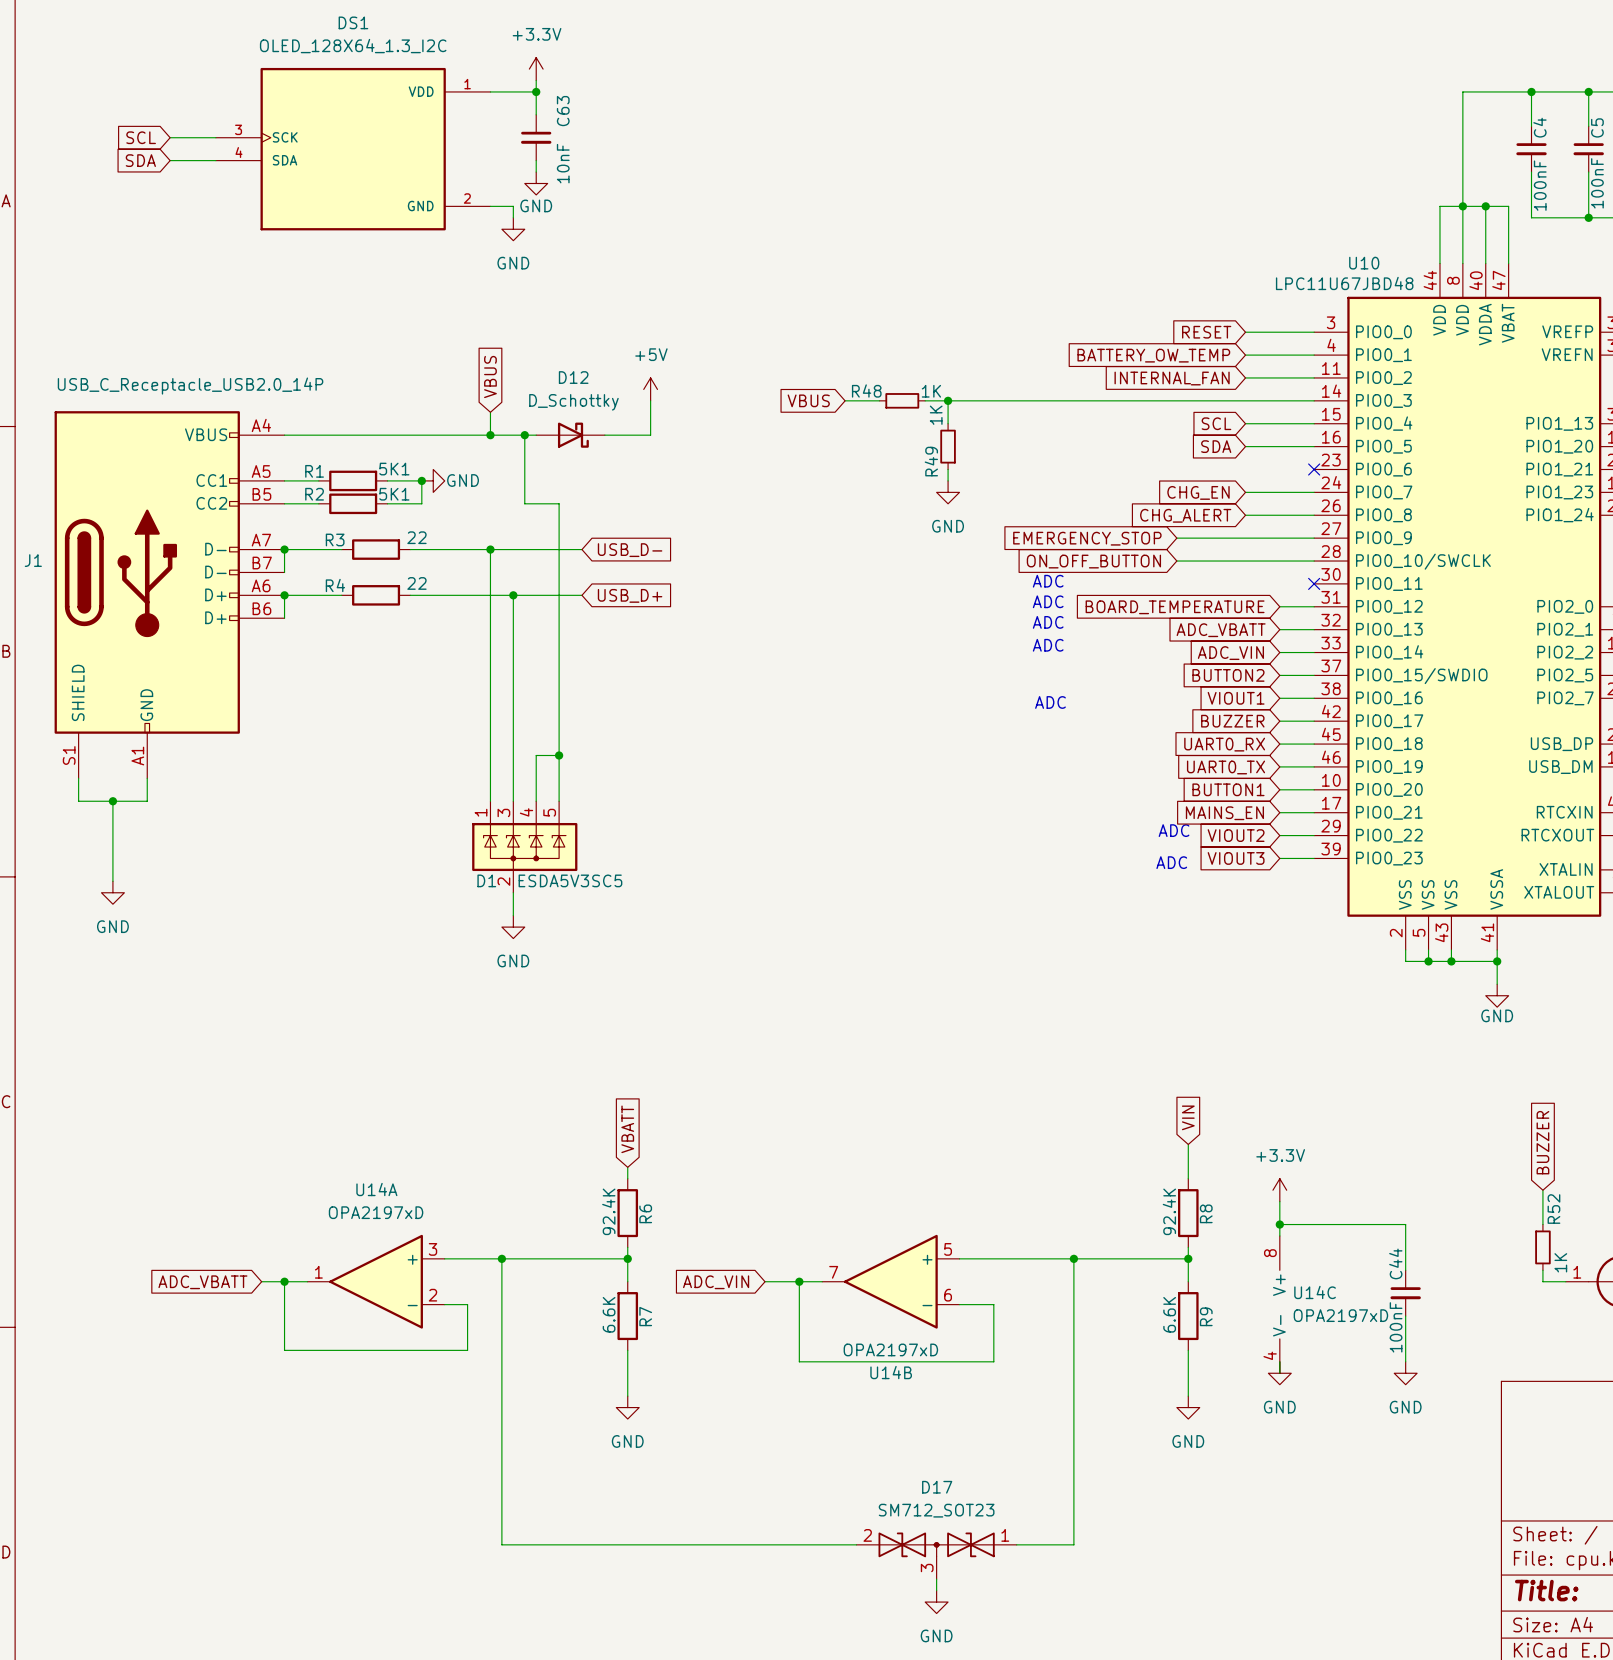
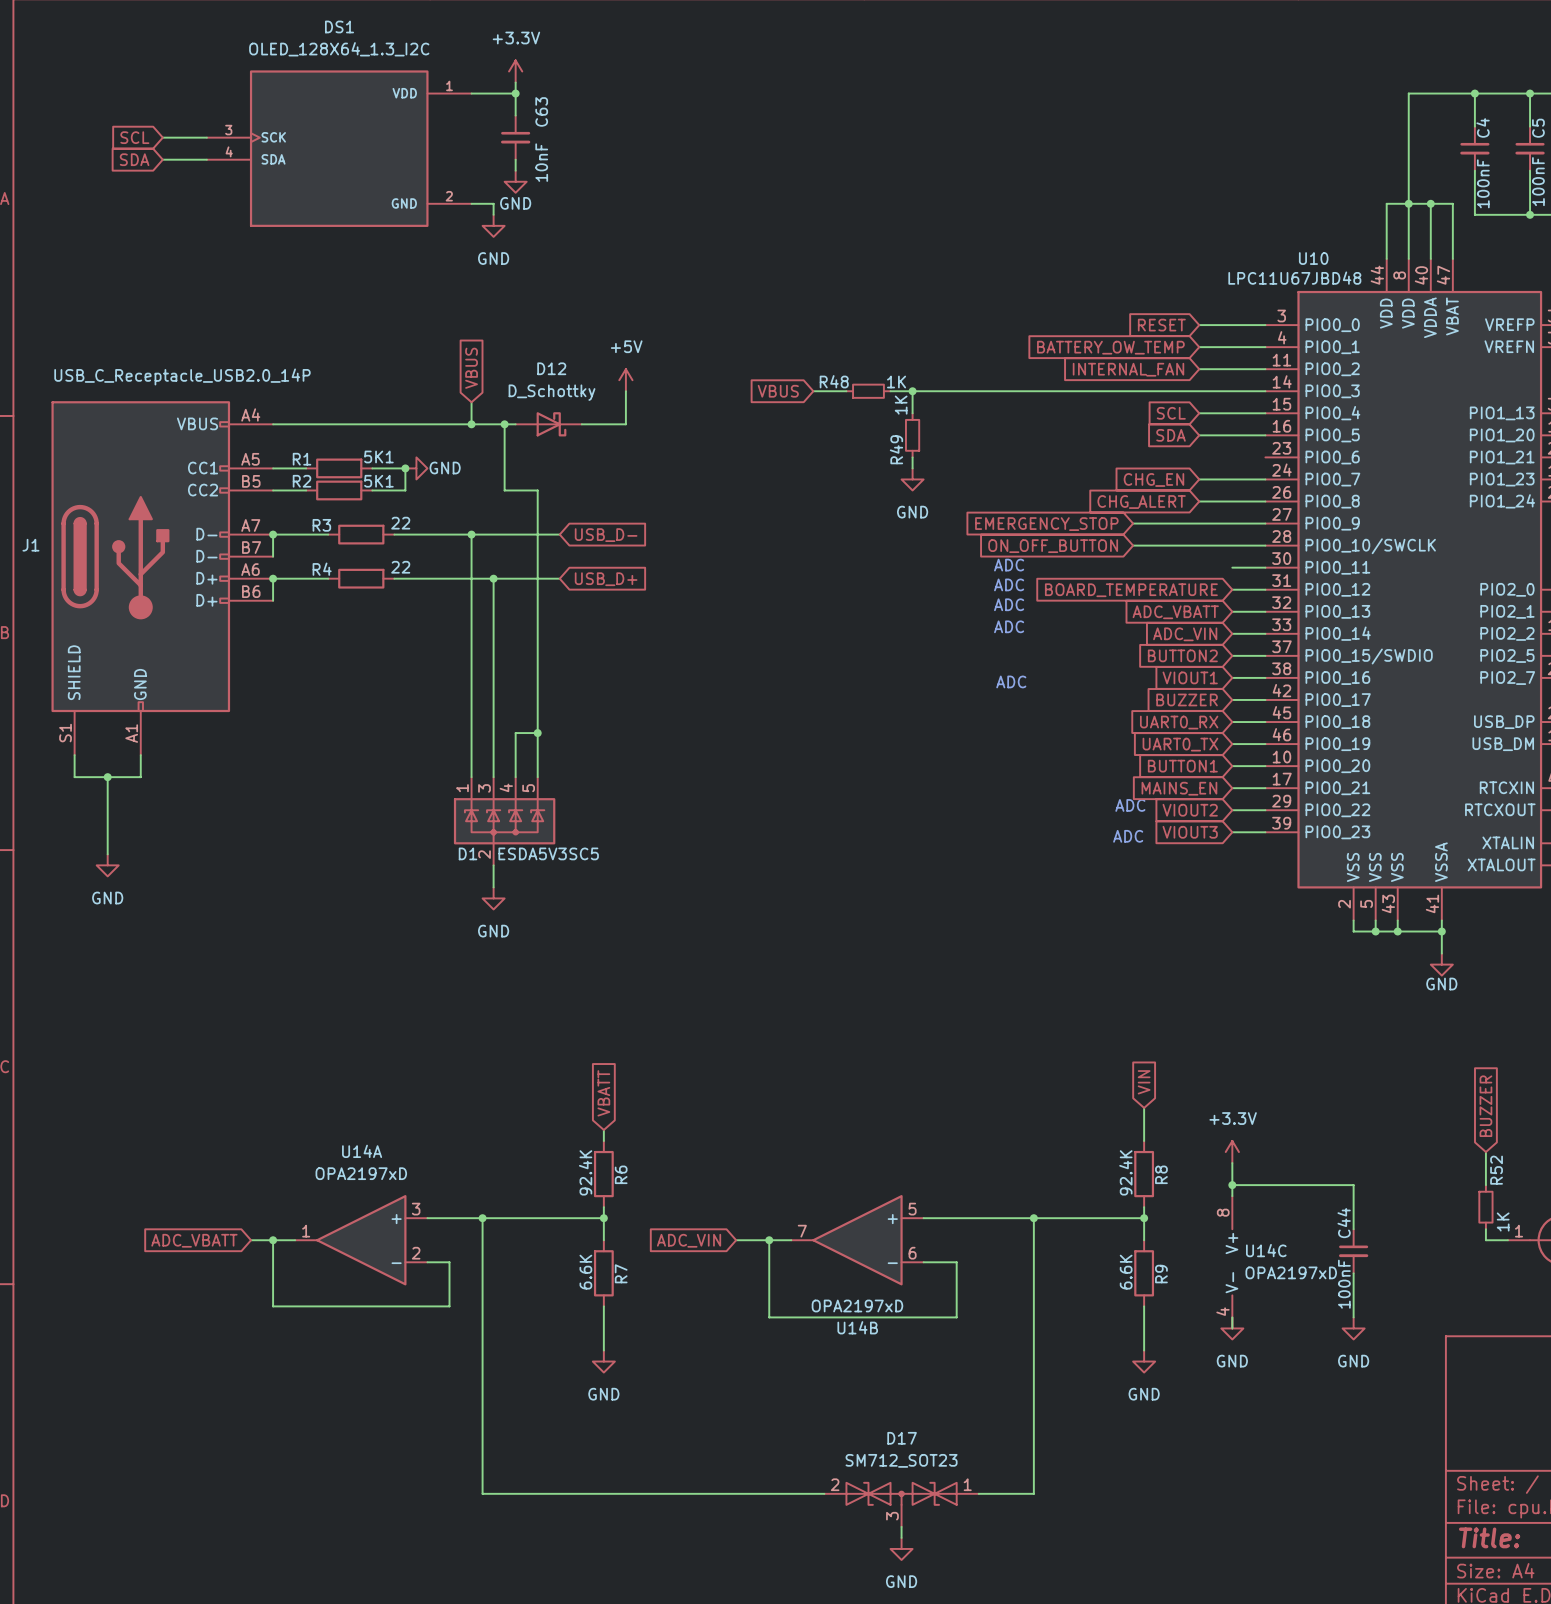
no-connect mark: (1314, 469) -> none
wire: none -> (1232, 567) (1265, 567)
no-connect mark: (1314, 583) -> none

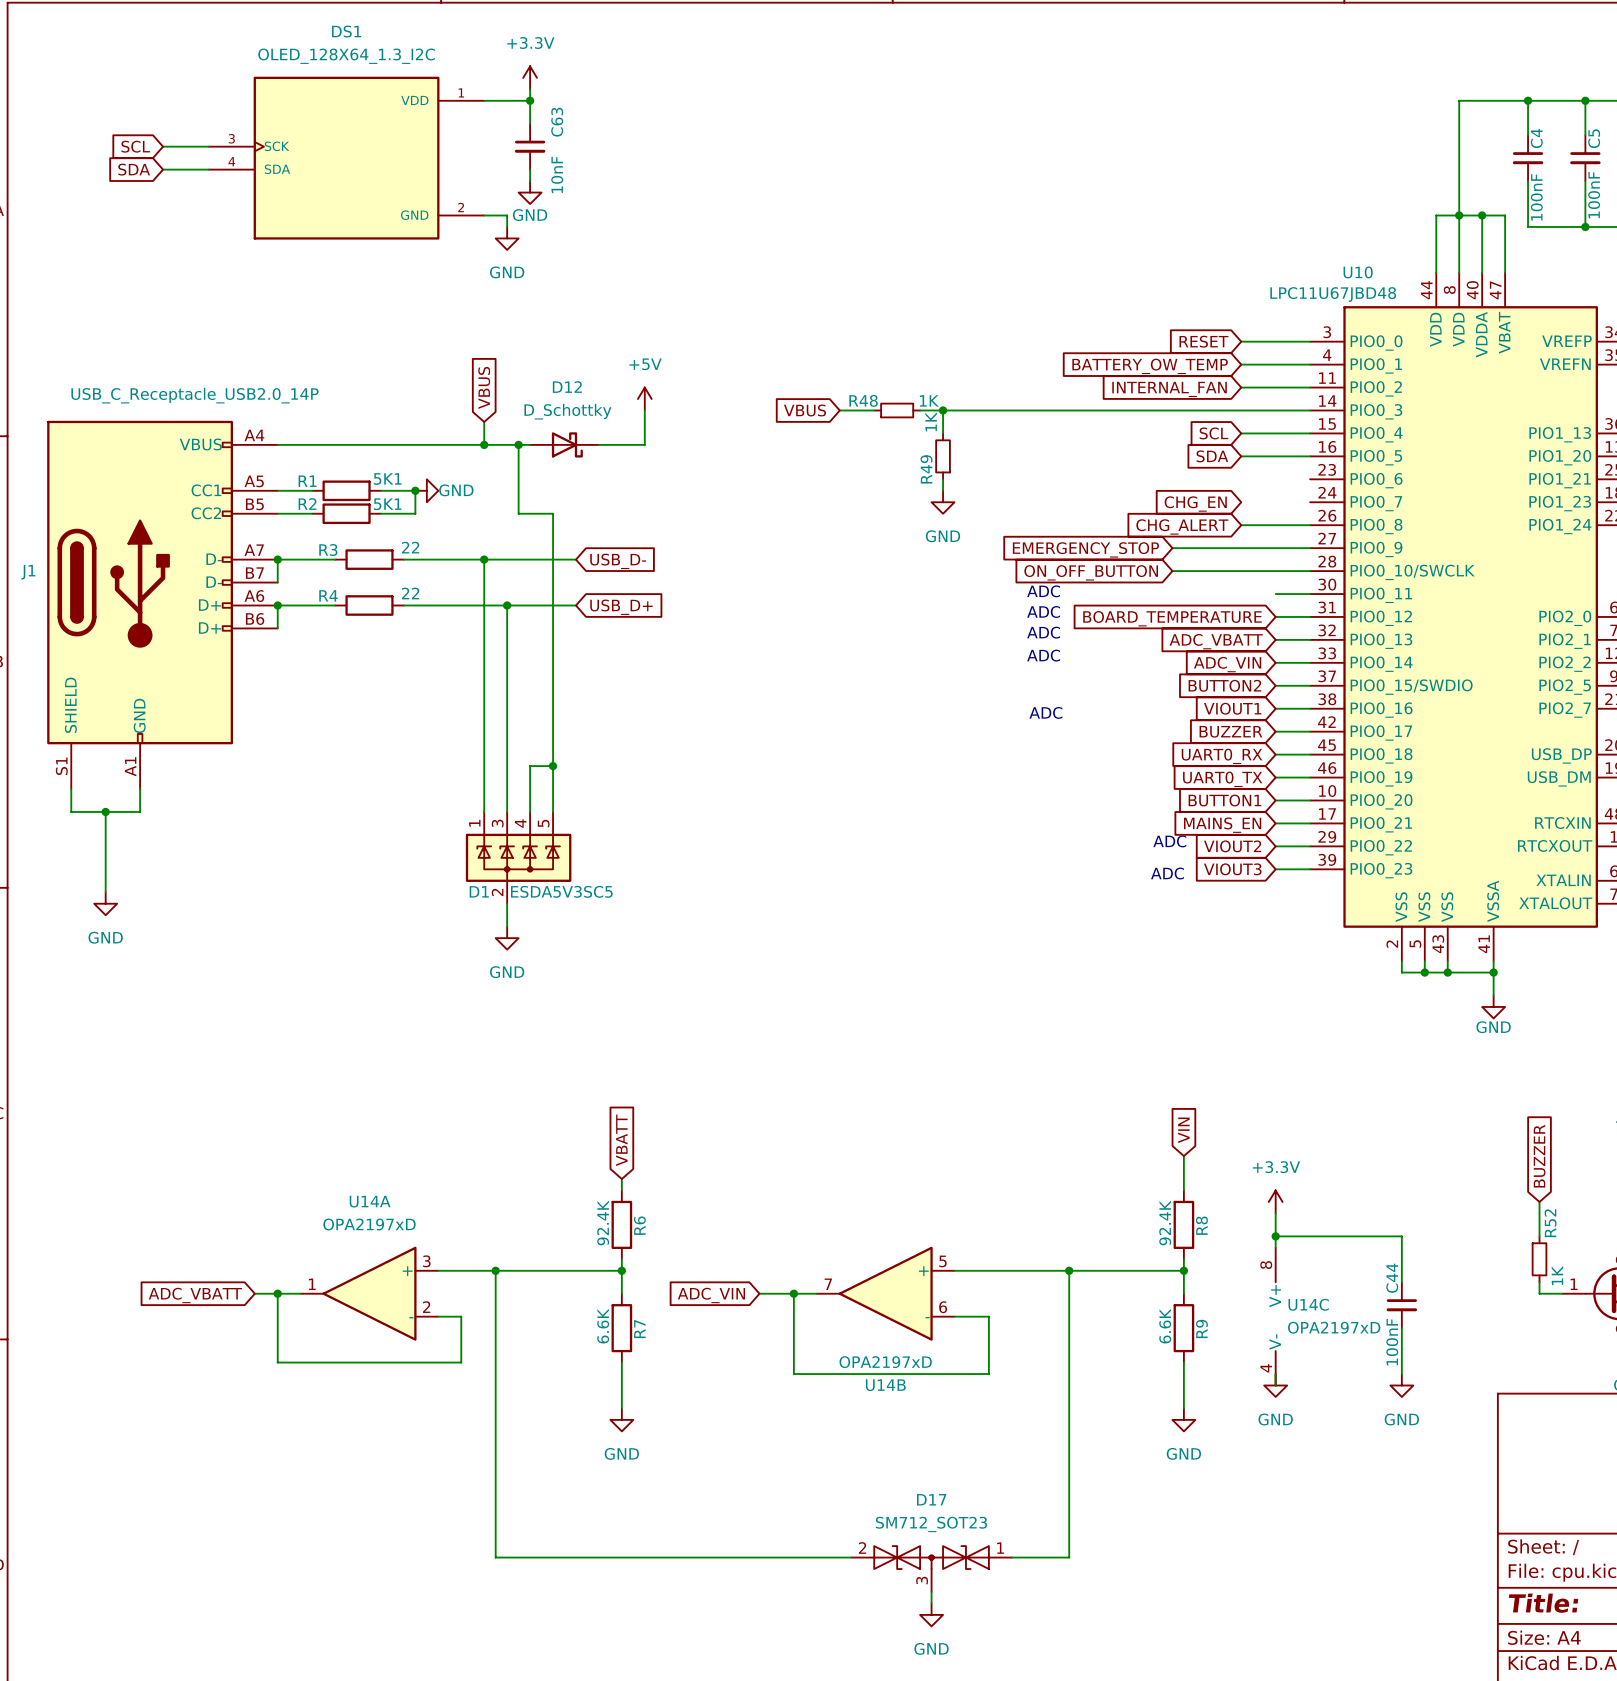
wire: (1199, 479) (1265, 479) -> none

